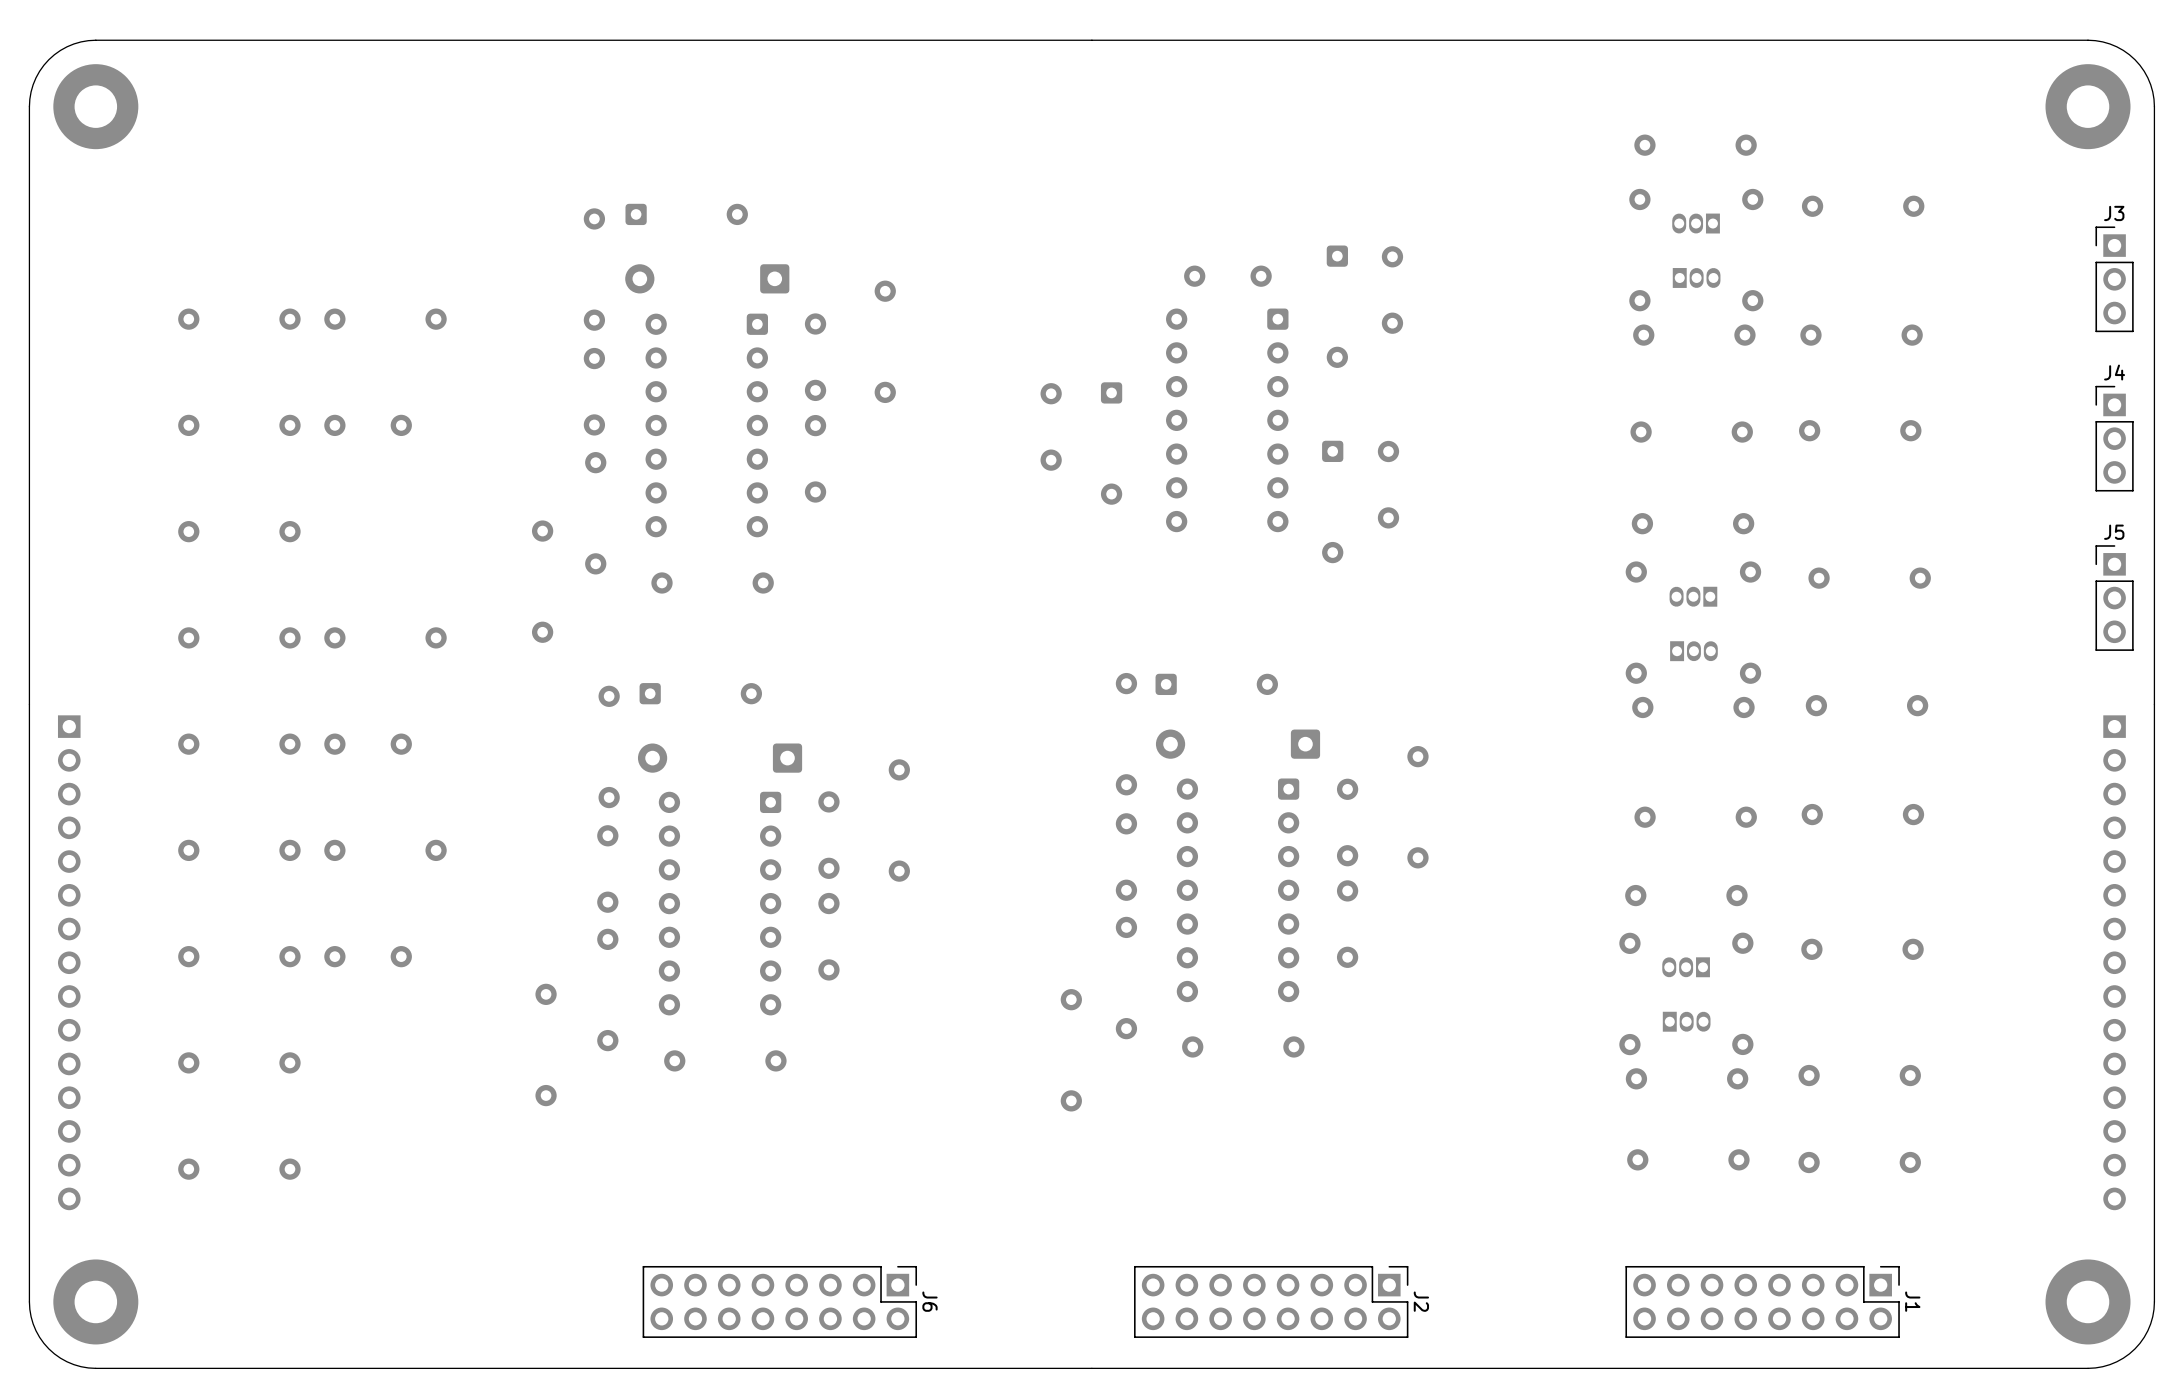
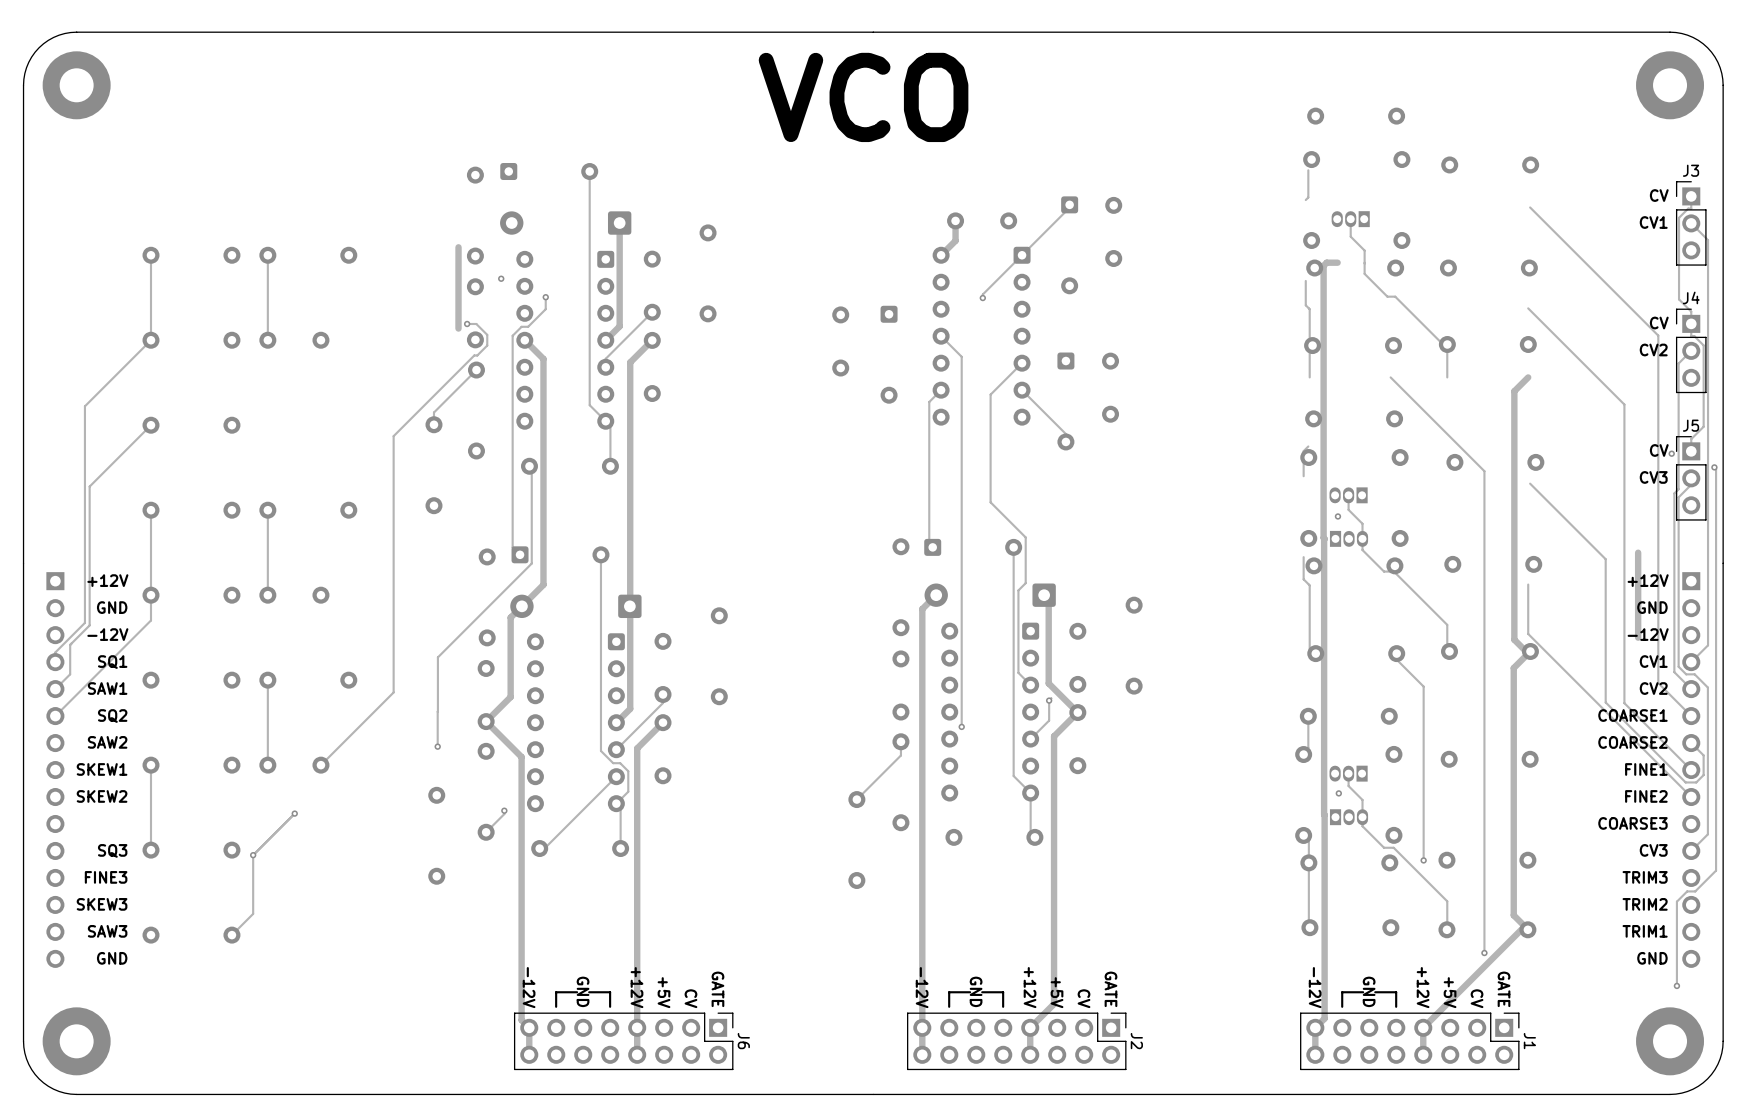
text: none -> VCO (863, 97)
track: none -> (1308, 170) (1308, 197) (1305, 200)
track: none -> (589, 171) (589, 405) (610, 425) (610, 466)
part: (1696, 223) -> none
text: none -> CV (1659, 195)
track: none -> (1691, 196) (1691, 208) (1688, 208) (1679, 217) (1679, 299) (1691, 311) (1691, 336) (1694, 336) (1703, 345) (1703, 426) (1691, 439) (1691, 451)
track: none -> (1069, 204) (1069, 207) (982, 294) (982, 297)
track: none -> (1530, 207) (1658, 335) (1658, 683) (1691, 716)
track: none -> (1350, 219) (1350, 236) (1364, 250) (1364, 273) (1387, 296) (1395, 296) (1447, 348) (1447, 377)
track: none -> (955, 220) (955, 240) (941, 255)
part rotation: 0° (1696, 277) -> 180° (1350, 219)
track: none -> (619, 223) (619, 326) (605, 340)
text: none -> CV1 (1653, 222)
track: none -> (1691, 223) (1708, 240) (1708, 645) (1691, 662)
track: none -> (458, 247) (458, 328)
track: none -> (151, 255) (151, 340) (84, 406) (84, 622) (55, 652) (55, 662)
track: none -> (267, 255) (267, 340)
track: none -> (1337, 262) (1326, 262) (1323, 265) (1324, 1018) (1315, 1027) (1315, 1054)
via: none -> (501, 278)
track: none -> (1305, 280) (1305, 305) (1309, 309) (1309, 377)
via: none -> (545, 297)
via: none -> (982, 298)
track: none -> (547, 298) (545, 297) (545, 309) (528, 326) (521, 326) (512, 335) (512, 547) (520, 554)
track: none -> (1528, 308) (1624, 404) (1624, 703) (1691, 770)
track: none -> (652, 312) (605, 358) (605, 367)
text: none -> CV (1659, 323)
track: none -> (467, 323) (476, 323) (487, 334) (487, 345) (477, 355) (474, 355) (393, 436) (393, 692) (320, 765)
via: none -> (467, 323)
track: none -> (941, 336) (961, 356) (961, 726)
track: none -> (524, 340) (543, 358) (543, 584) (510, 617) (510, 697) (486, 721) (521, 757) (521, 1020) (529, 1027) (529, 1054)
track: none -> (652, 340) (630, 362) (630, 708) (616, 722)
text: none -> CV2 (1653, 349)
track: none -> (1691, 350) (1678, 363) (1678, 489) (1674, 493) (1674, 672) (1691, 689)
track: none -> (1022, 363) (990, 394) (990, 502) (1025, 537) (1025, 583) (1018, 590) (1018, 672) (1030, 685)
track: none -> (476, 370) (433, 412) (433, 424)
track: none -> (1390, 377) (1484, 471) (1484, 953)
track: none -> (1528, 377) (1514, 391) (1514, 639) (1528, 653) (1513, 668) (1513, 915) (1528, 929)
track: none -> (941, 390) (929, 402) (929, 543) (932, 547)
track: none -> (1022, 390) (1065, 434) (1065, 441)
track: none -> (151, 425) (89, 486) (89, 625) (70, 644) (70, 674) (55, 689)
track: none -> (1308, 446) (1303, 451) (1303, 476)
text: none -> CV (1659, 450)
via: none -> (1671, 453)
track: none -> (529, 466) (531, 468) (531, 563) (437, 657) (437, 746)
track: none -> (1714, 467) (1716, 469) (1716, 870) (1695, 891) (1687, 891) (1676, 901) (1676, 985)
via: none -> (1714, 467)
part: (1693, 596) -> none
text: none -> CV3 (1653, 477)
track: none -> (1691, 478) (1691, 484) (1678, 497) (1678, 666) (1686, 674) (1694, 674) (1707, 687) (1707, 834) (1691, 850)
track: none -> (1530, 483) (1605, 559) (1605, 702) (1685, 782) (1696, 782) (1703, 775) (1703, 755) (1691, 743)
track: none -> (1348, 495) (1348, 509) (1362, 523) (1362, 550) (1384, 571) (1393, 571) (1447, 624) (1447, 653)
part: none -> (1348, 495)
track: none -> (151, 510) (151, 620) (55, 716)
track: none -> (267, 510) (267, 595)
via: none -> (1337, 516)
part: (1693, 651) -> none
part: none -> (1349, 538)
track: none -> (1013, 547) (1013, 776) (1030, 793) (1030, 833) (1034, 837)
track: none -> (1638, 552) (1638, 637)
track: none -> (600, 554) (600, 750) (613, 763) (620, 763) (628, 771) (628, 791) (616, 803) (620, 807) (620, 848)
track: none -> (1303, 557) (1303, 579) (1309, 585) (1309, 653)
text: none -> +12V (107, 580)
text: none -> +12V (1648, 580)
track: none -> (1528, 584) (1528, 633) (1691, 797)
track: none -> (936, 595) (922, 609) (922, 1054)
track: none -> (1044, 595) (1048, 599) (1048, 683) (1077, 712) (1054, 736) (1054, 1004) (1030, 1027) (1030, 1054)
text: none -> GND (112, 607)
text: none -> GND (1652, 607)
text: none -> -12V (107, 634)
text: none -> -12V (1648, 634)
track: none -> (1390, 653) (1423, 686) (1423, 860)
text: none -> SQ1 (112, 662)
text: none -> CV1 (1653, 661)
track: none -> (267, 680) (267, 765)
text: none -> SAW1 (107, 688)
text: none -> CV2 (1653, 688)
track: none -> (663, 694) (663, 703) (616, 749)
track: none -> (1051, 698) (1049, 700) (1049, 720) (1030, 739)
via: none -> (1049, 700)
text: none -> COARSE1 (1632, 715)
text: none -> SQ2 (112, 716)
track: none -> (663, 722) (637, 748) (637, 1054)
track: none -> (1308, 722) (1308, 747) (1303, 752)
via: none -> (961, 726)
track: none -> (900, 741) (900, 755) (856, 799)
text: none -> SAW2 (107, 742)
text: none -> COARSE2 (1632, 742)
via: none -> (437, 746)
track: none -> (151, 765) (151, 850)
text: none -> SKEW1 (102, 769)
text: none -> FINE1 (1646, 769)
track: none -> (1348, 771) (1348, 786) (1362, 799) (1362, 826) (1384, 847) (1393, 847) (1447, 901) (1447, 929)
track: none -> (616, 776) (544, 848) (539, 848)
via: none -> (1338, 793)
text: none -> SKEW2 (102, 796)
text: none -> FINE2 (1646, 796)
track: none -> (504, 810) (504, 814) (486, 832)
via: none -> (504, 810)
track: none -> (294, 813) (253, 855) (253, 913) (231, 935)
via: none -> (294, 813)
text: none -> COARSE3 (1632, 823)
track: none -> (1303, 833) (1308, 838) (1309, 929)
text: none -> SQ3 (112, 850)
text: none -> CV3 (1653, 850)
via: none -> (253, 855)
via: none -> (1423, 860)
text: none -> FINE3 (106, 877)
text: none -> TRIM3 (1645, 877)
text: none -> SKEW3 (102, 904)
text: none -> TRIM2 (1645, 904)
track: none -> (1524, 926) (1423, 1027) (1423, 1054)
text: none -> SAW3 (107, 931)
text: none -> TRIM1 (1645, 931)
via: none -> (1484, 953)
text: none -> GND (112, 958)
text: none -> GND (1652, 958)
via: none -> (1676, 985)
text: none -> -12V (529, 987)
text: none -> +12V (637, 987)
text: none -> -12V (922, 987)
text: none -> +12V (1030, 987)
text: none -> -12V (1315, 987)
text: none -> +12V (1423, 987)
text: none -> GATE (717, 989)
text: none -> GATE (1110, 989)
text: none -> GATE (1504, 989)
line: none -> (577, 992) (556, 992) (556, 1006)
text: none -> GND (583, 991)
line: none -> (589, 992) (610, 992) (610, 1006)
line: none -> (970, 992) (949, 992) (949, 1006)
text: none -> GND (976, 991)
line: none -> (982, 992) (1003, 992) (1003, 1006)
line: none -> (1363, 992) (1342, 992) (1342, 1006)
text: none -> GND (1369, 991)
line: none -> (1375, 992) (1396, 992) (1396, 1006)
text: none -> +5V (663, 992)
text: none -> +5V (1057, 992)
text: none -> +5V (1450, 992)
text: none -> CV (690, 998)
text: none -> CV (1084, 998)
text: none -> CV (1477, 998)

